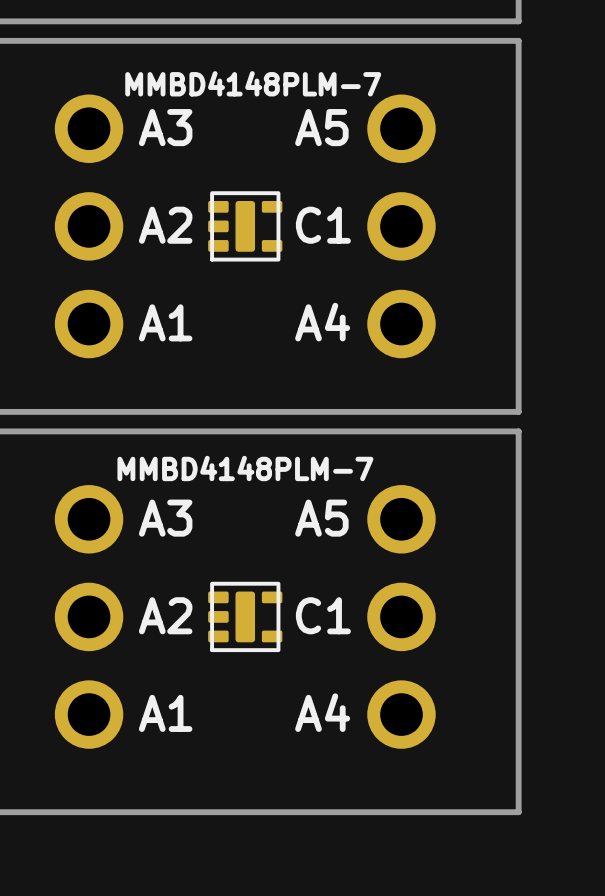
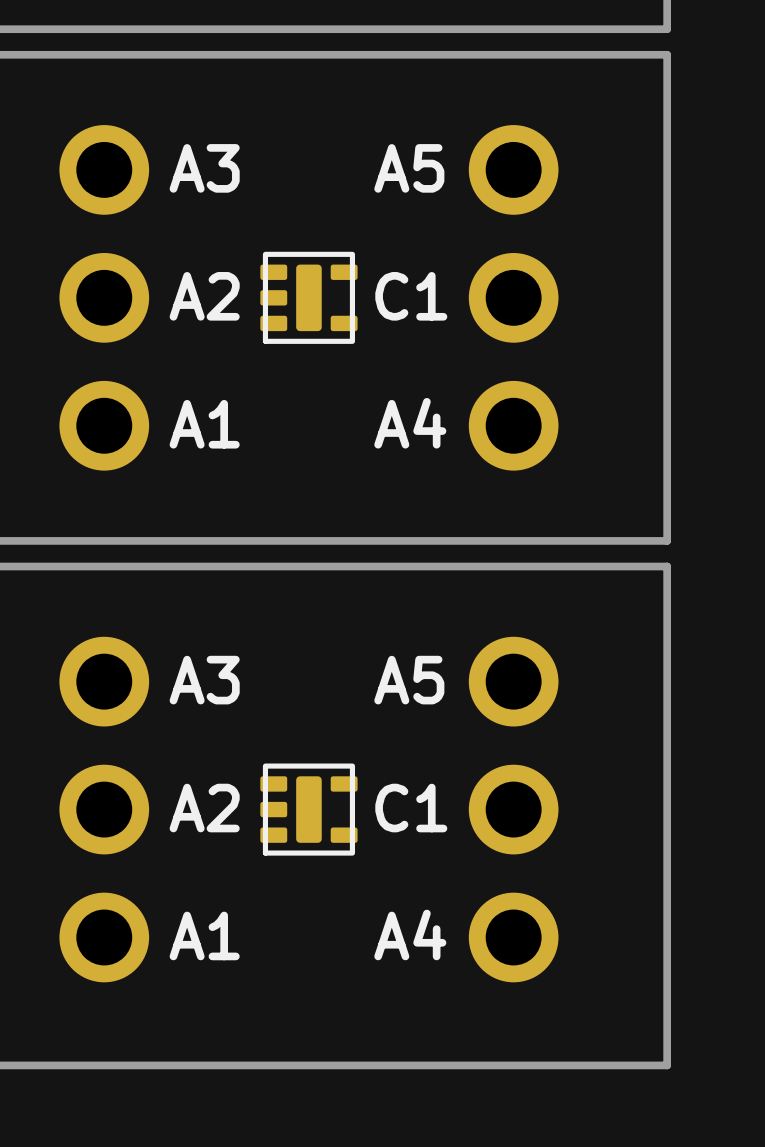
text: MMBD4148PLM-7 (253, 83) -> none
text: MMBD4148PLM-7 (245, 468) -> none

